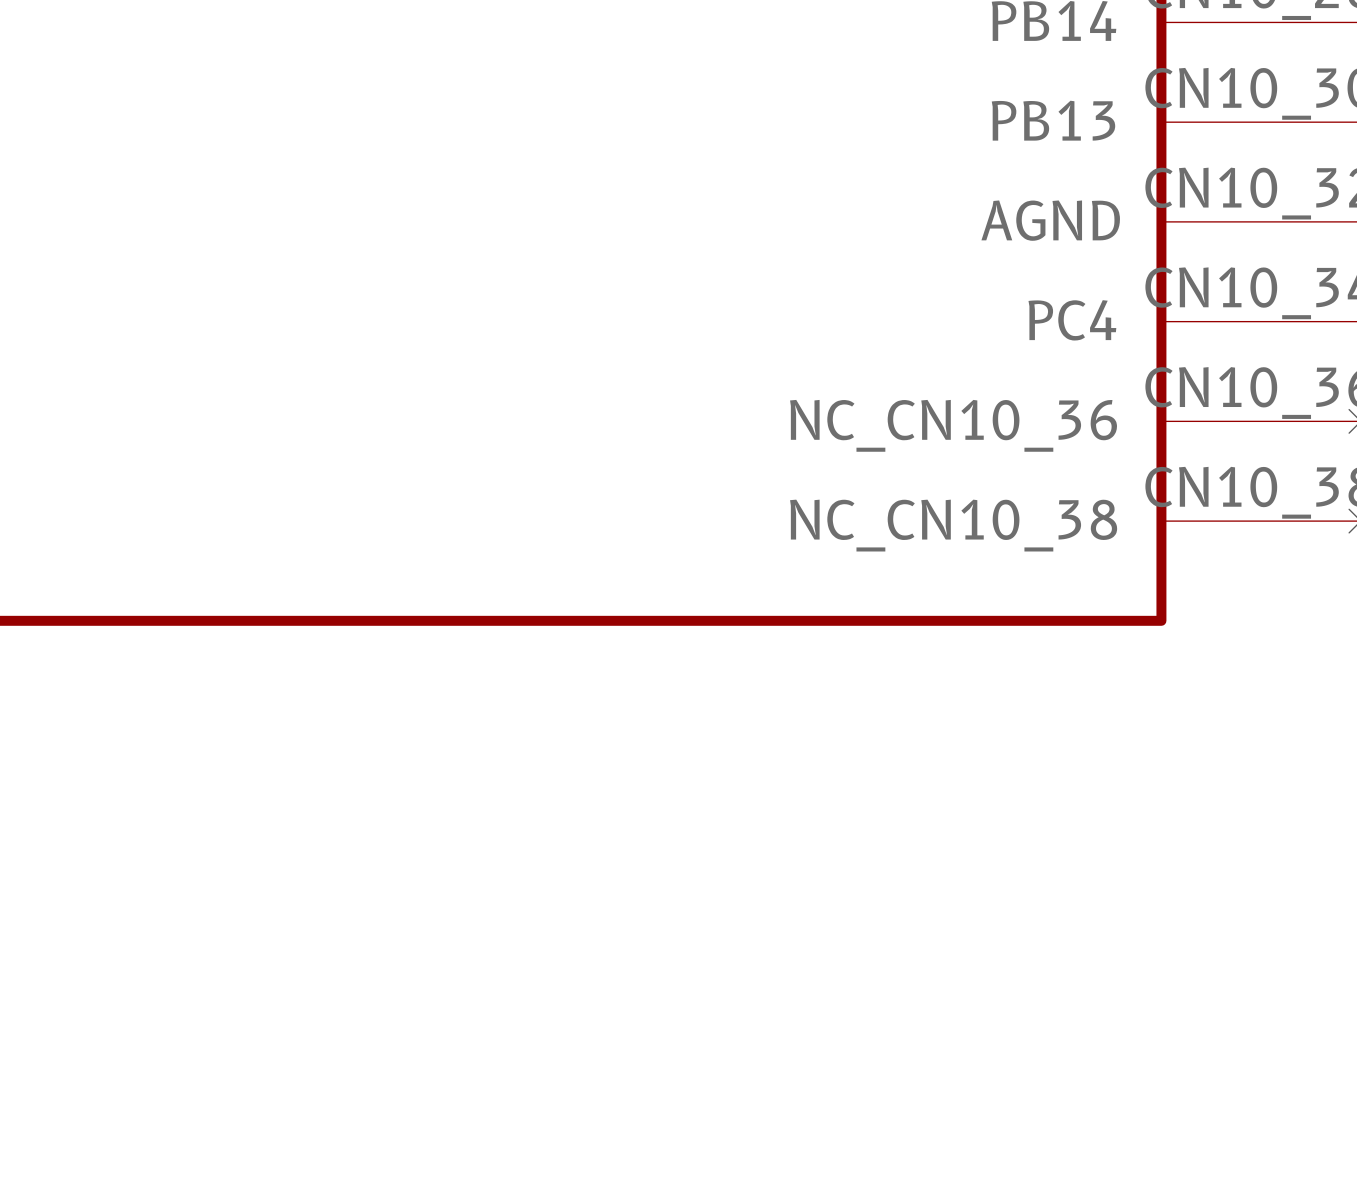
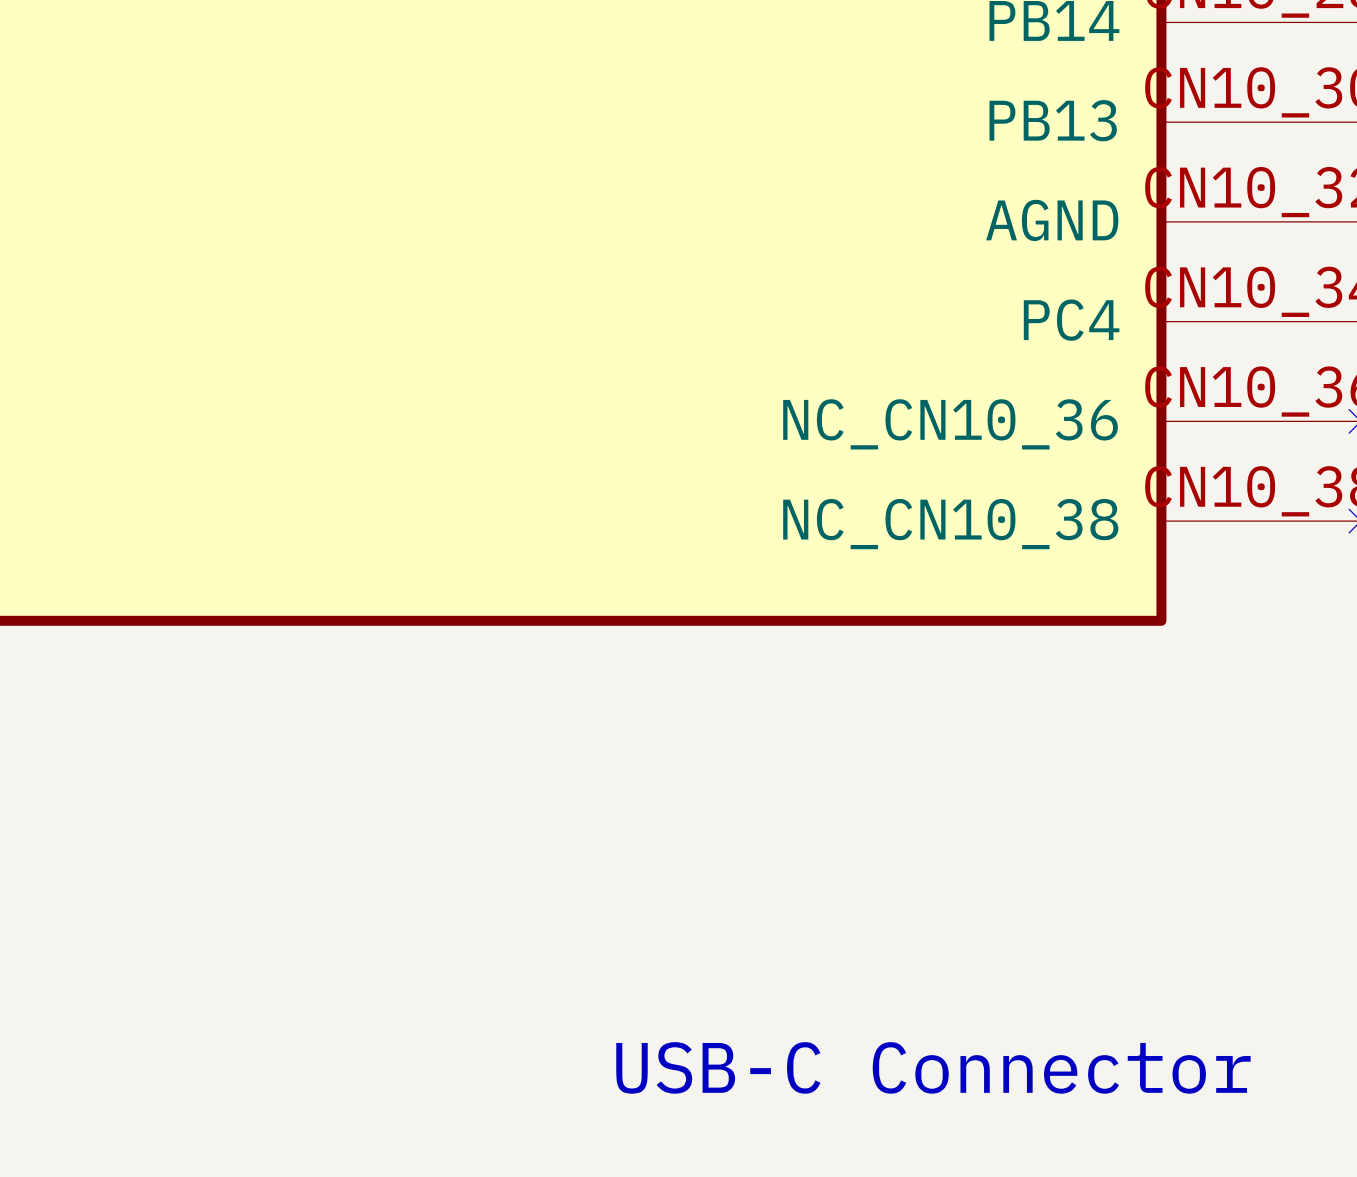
text: none -> USB-C Connector (933, 1067)

